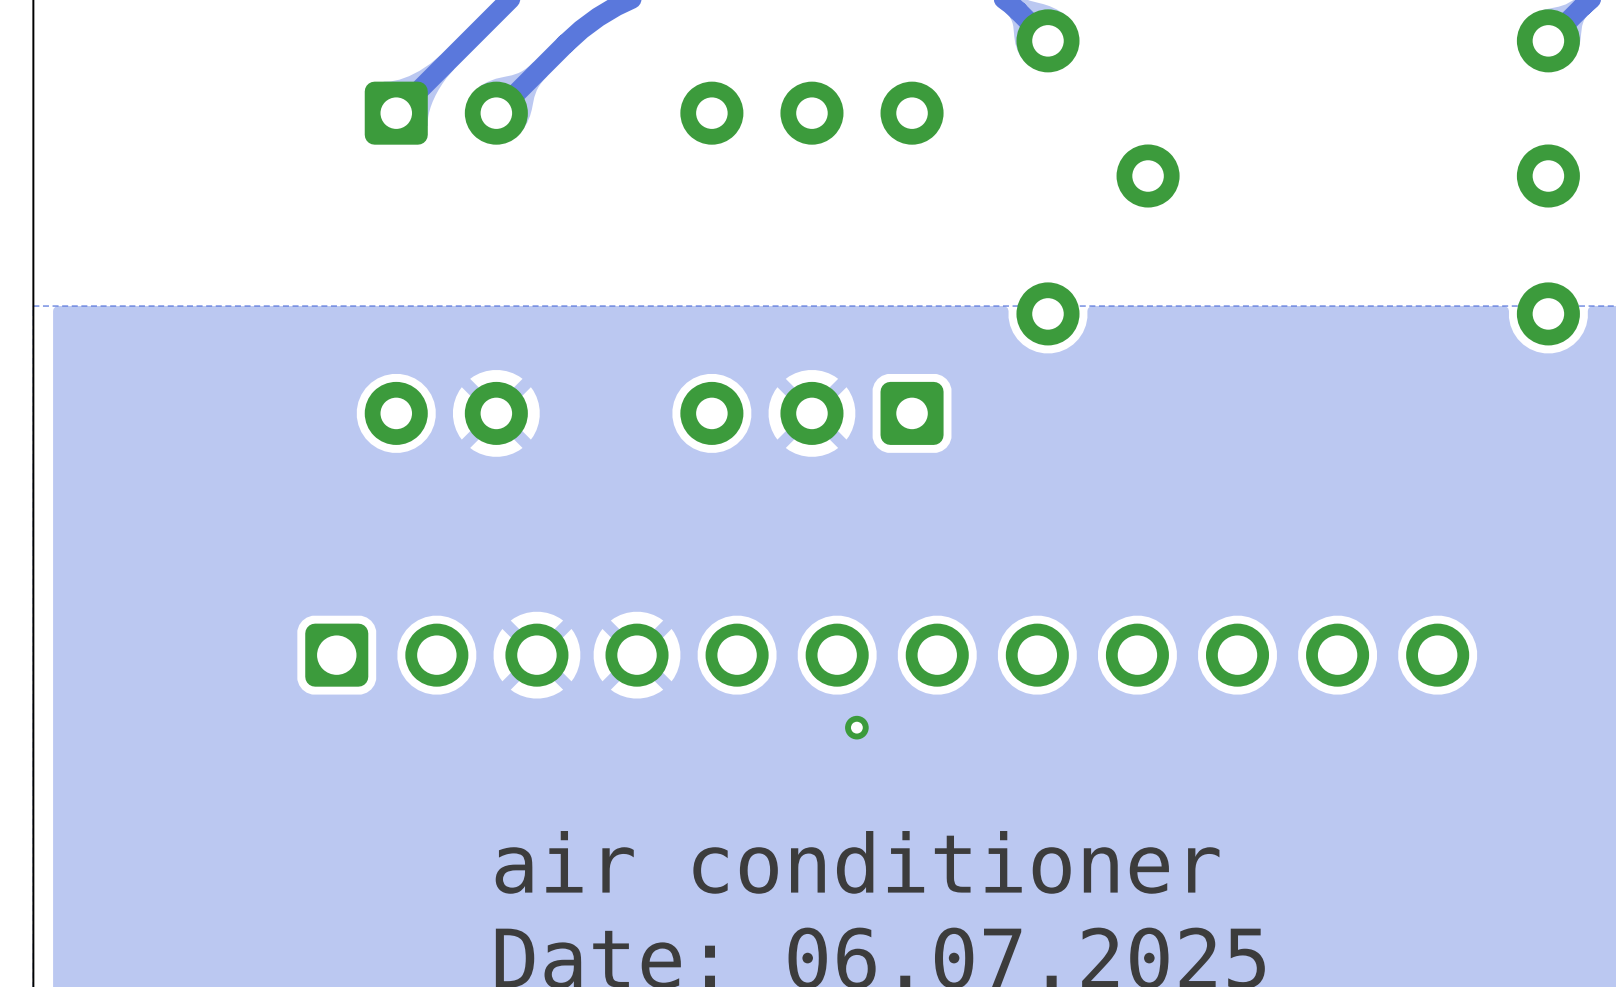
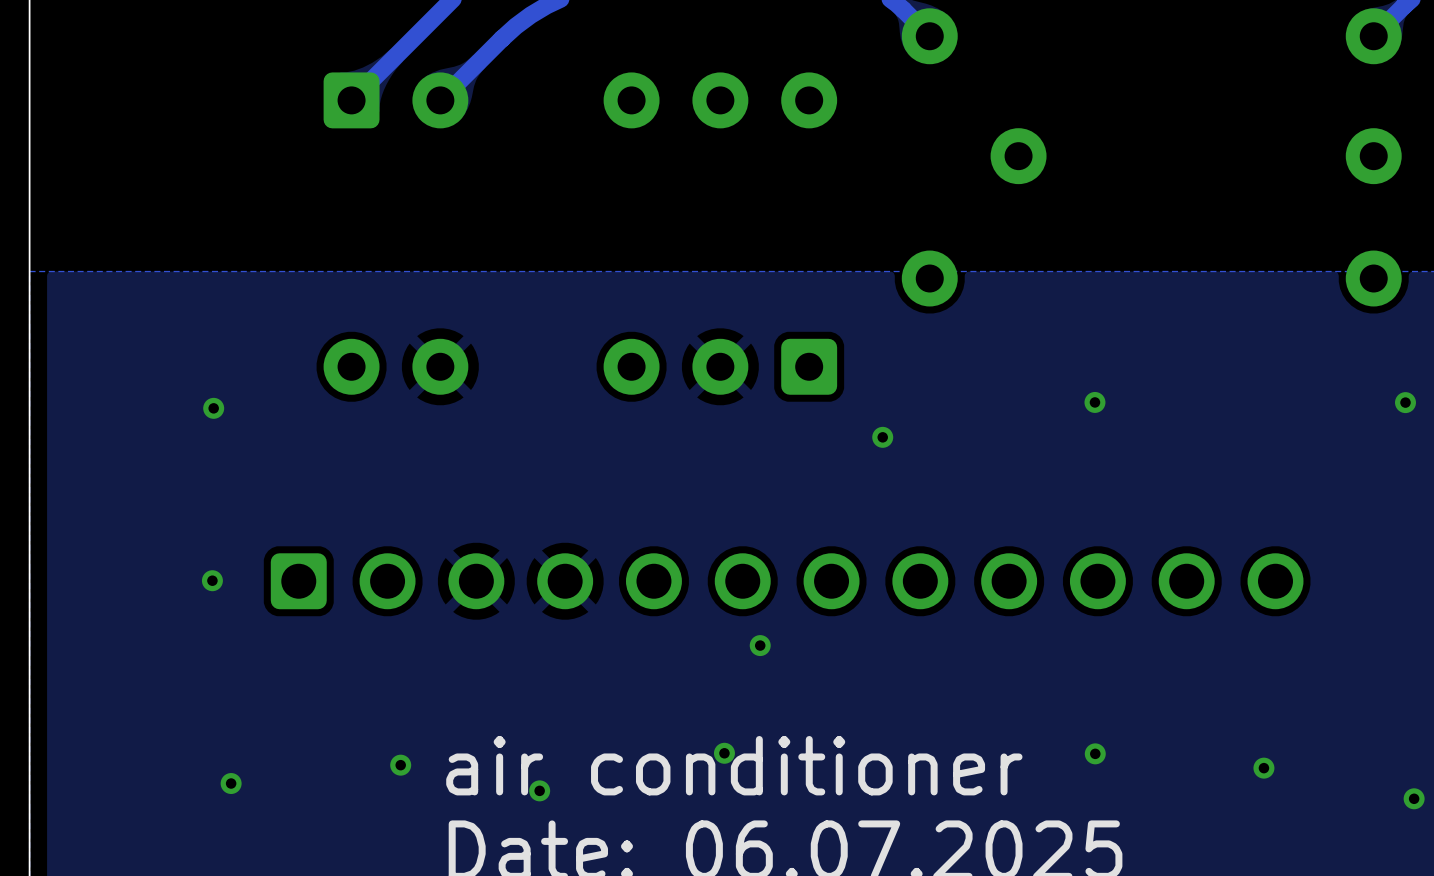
via: none -> (1094, 402)
via: none -> (1405, 402)
via: none -> (213, 408)
via: none -> (882, 437)
via: none -> (212, 580)
via: none -> (724, 753)
via: none -> (1095, 753)
via: none -> (400, 765)
via: none -> (1263, 768)
via: none -> (231, 783)
via: none -> (539, 790)
via: none -> (1414, 798)

